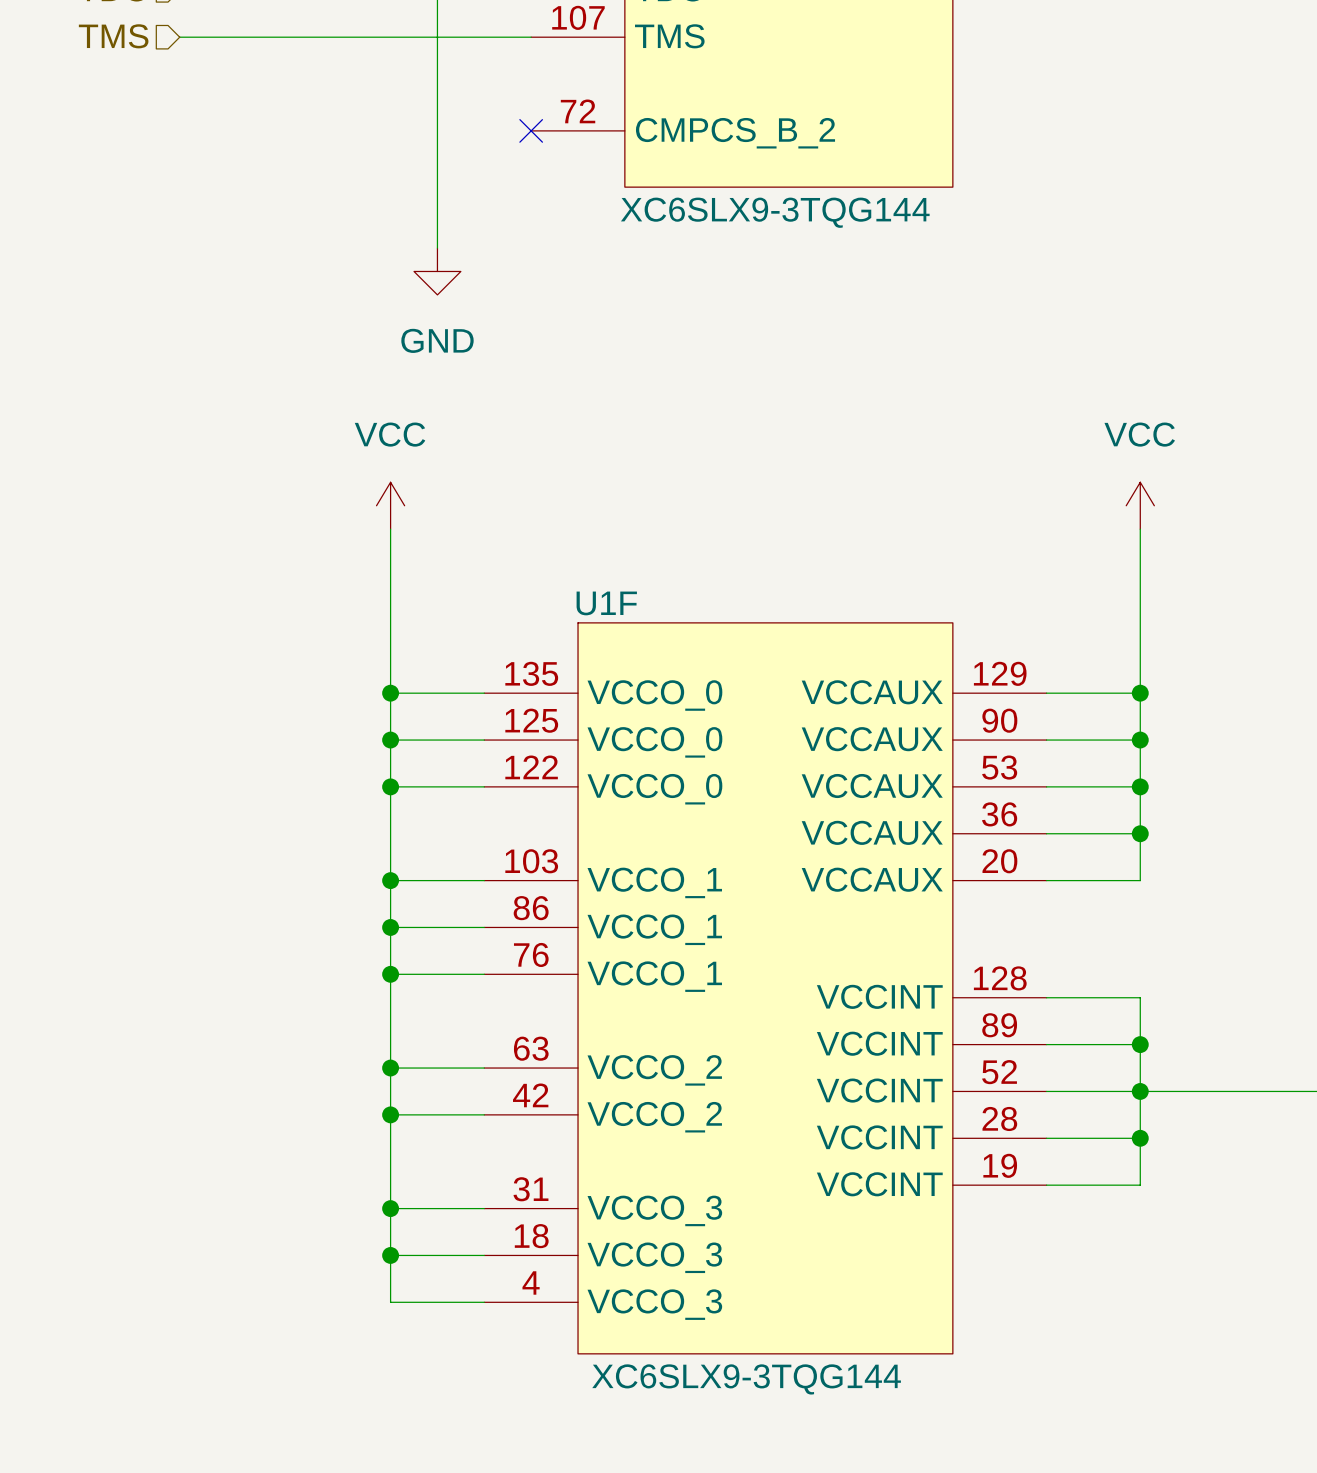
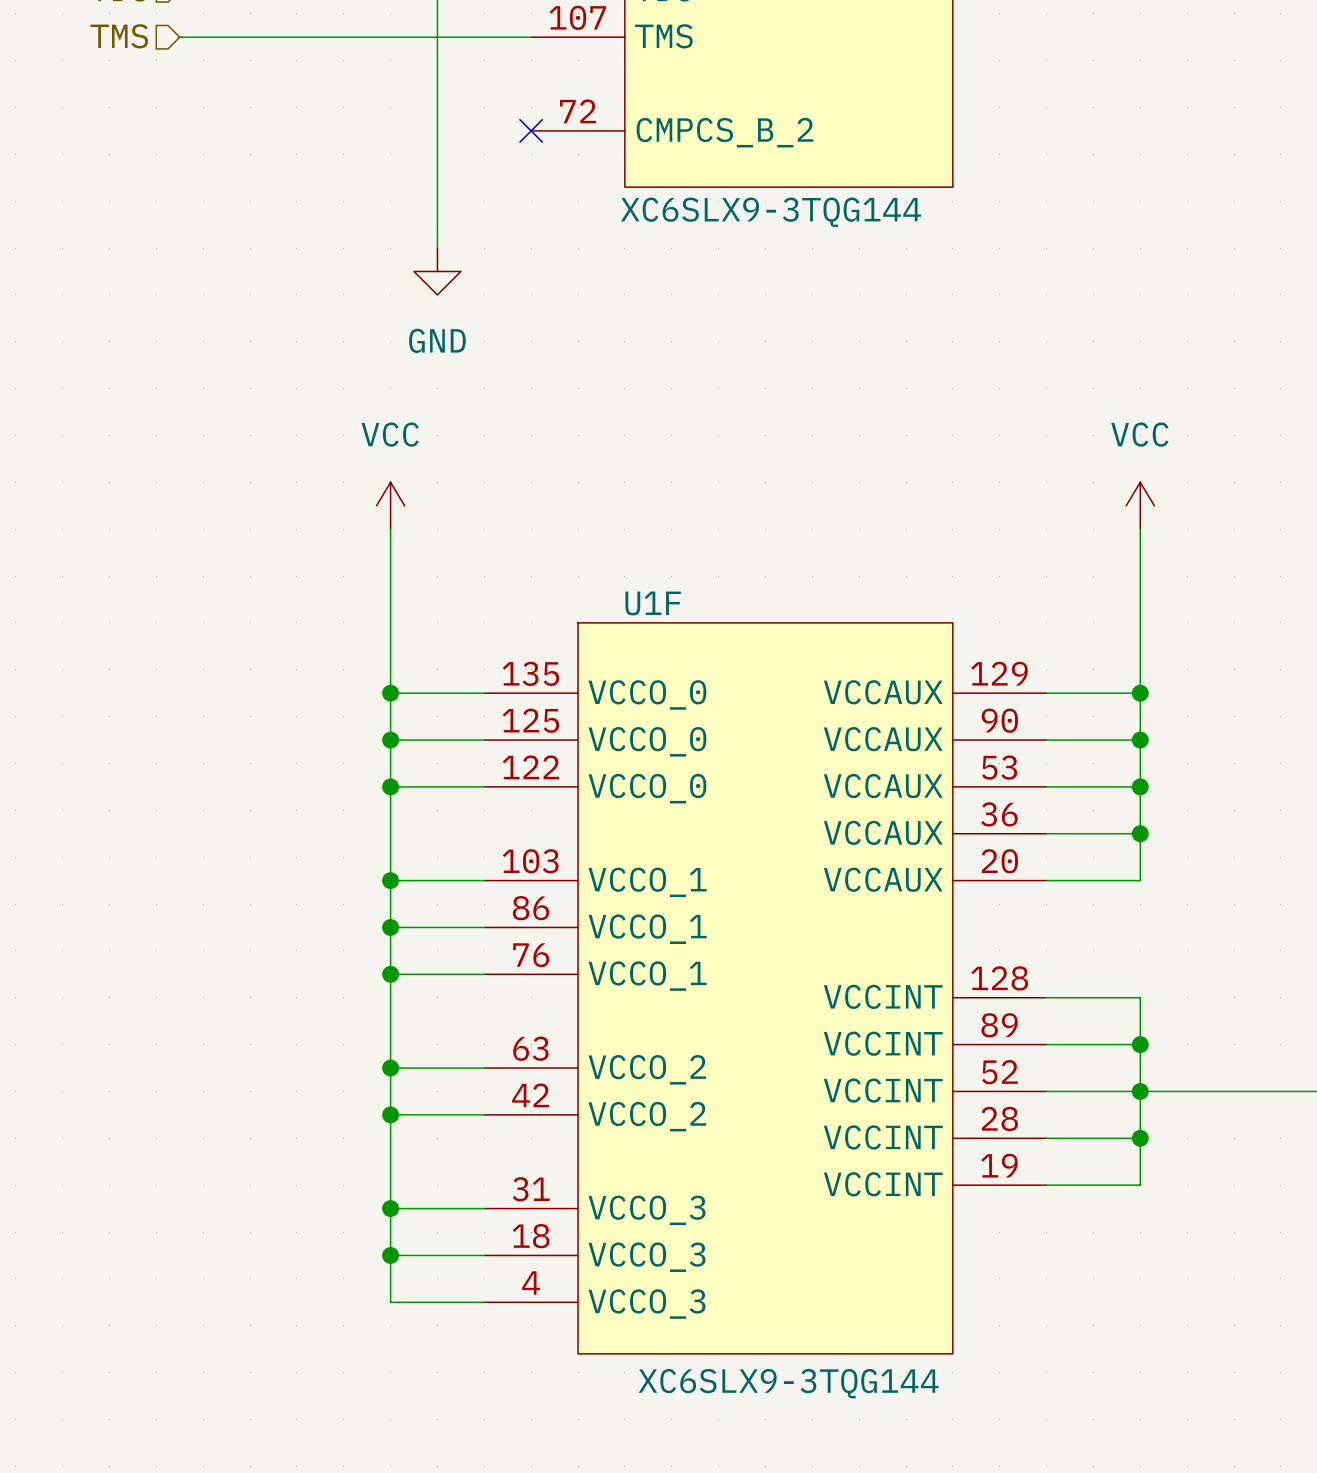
U1F name position: U1F (606, 603) -> U1F (653, 603)
U1F text position: XC6SLX9-3TQG144 (746, 1379) -> XC6SLX9-3TQG144 (788, 1383)

